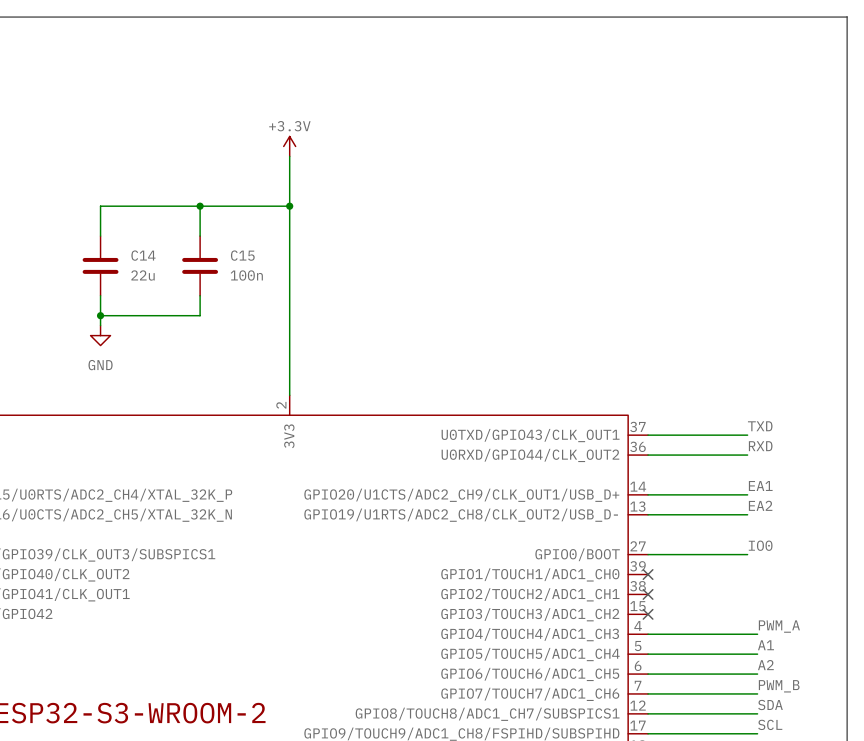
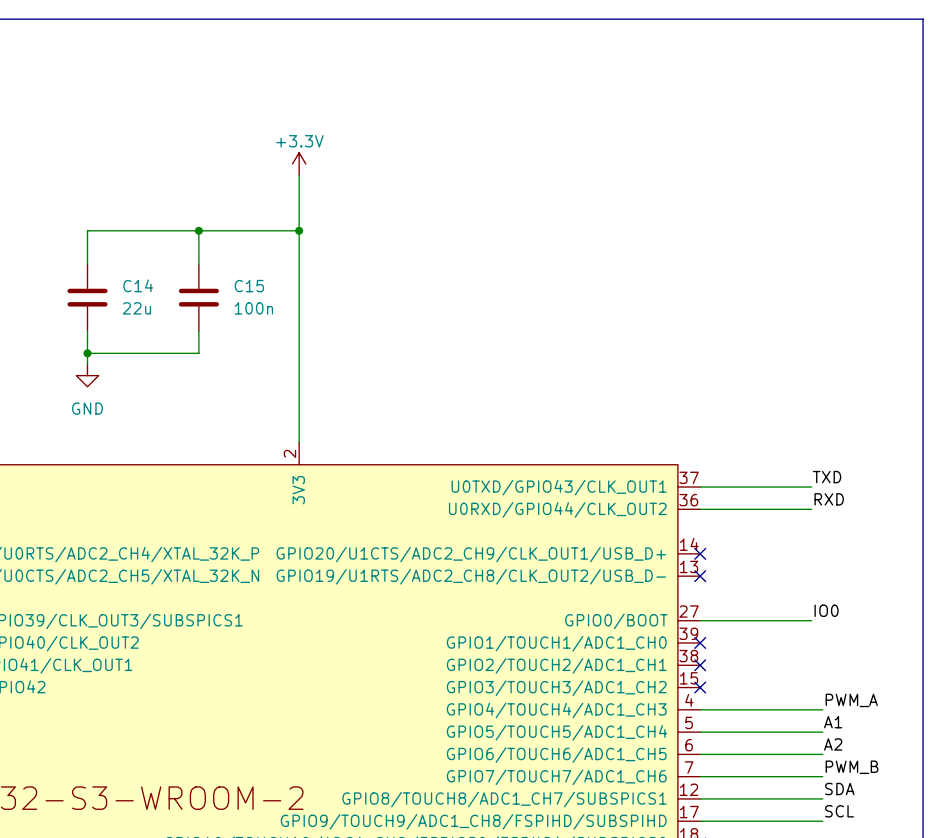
label: EA1 (760, 485) -> none
wire: (648, 494) (747, 494) -> none
no-connect mark: none -> (700, 553)
label: EA2 (760, 505) -> none
wire: (648, 514) (747, 514) -> none
no-connect mark: none -> (700, 576)

